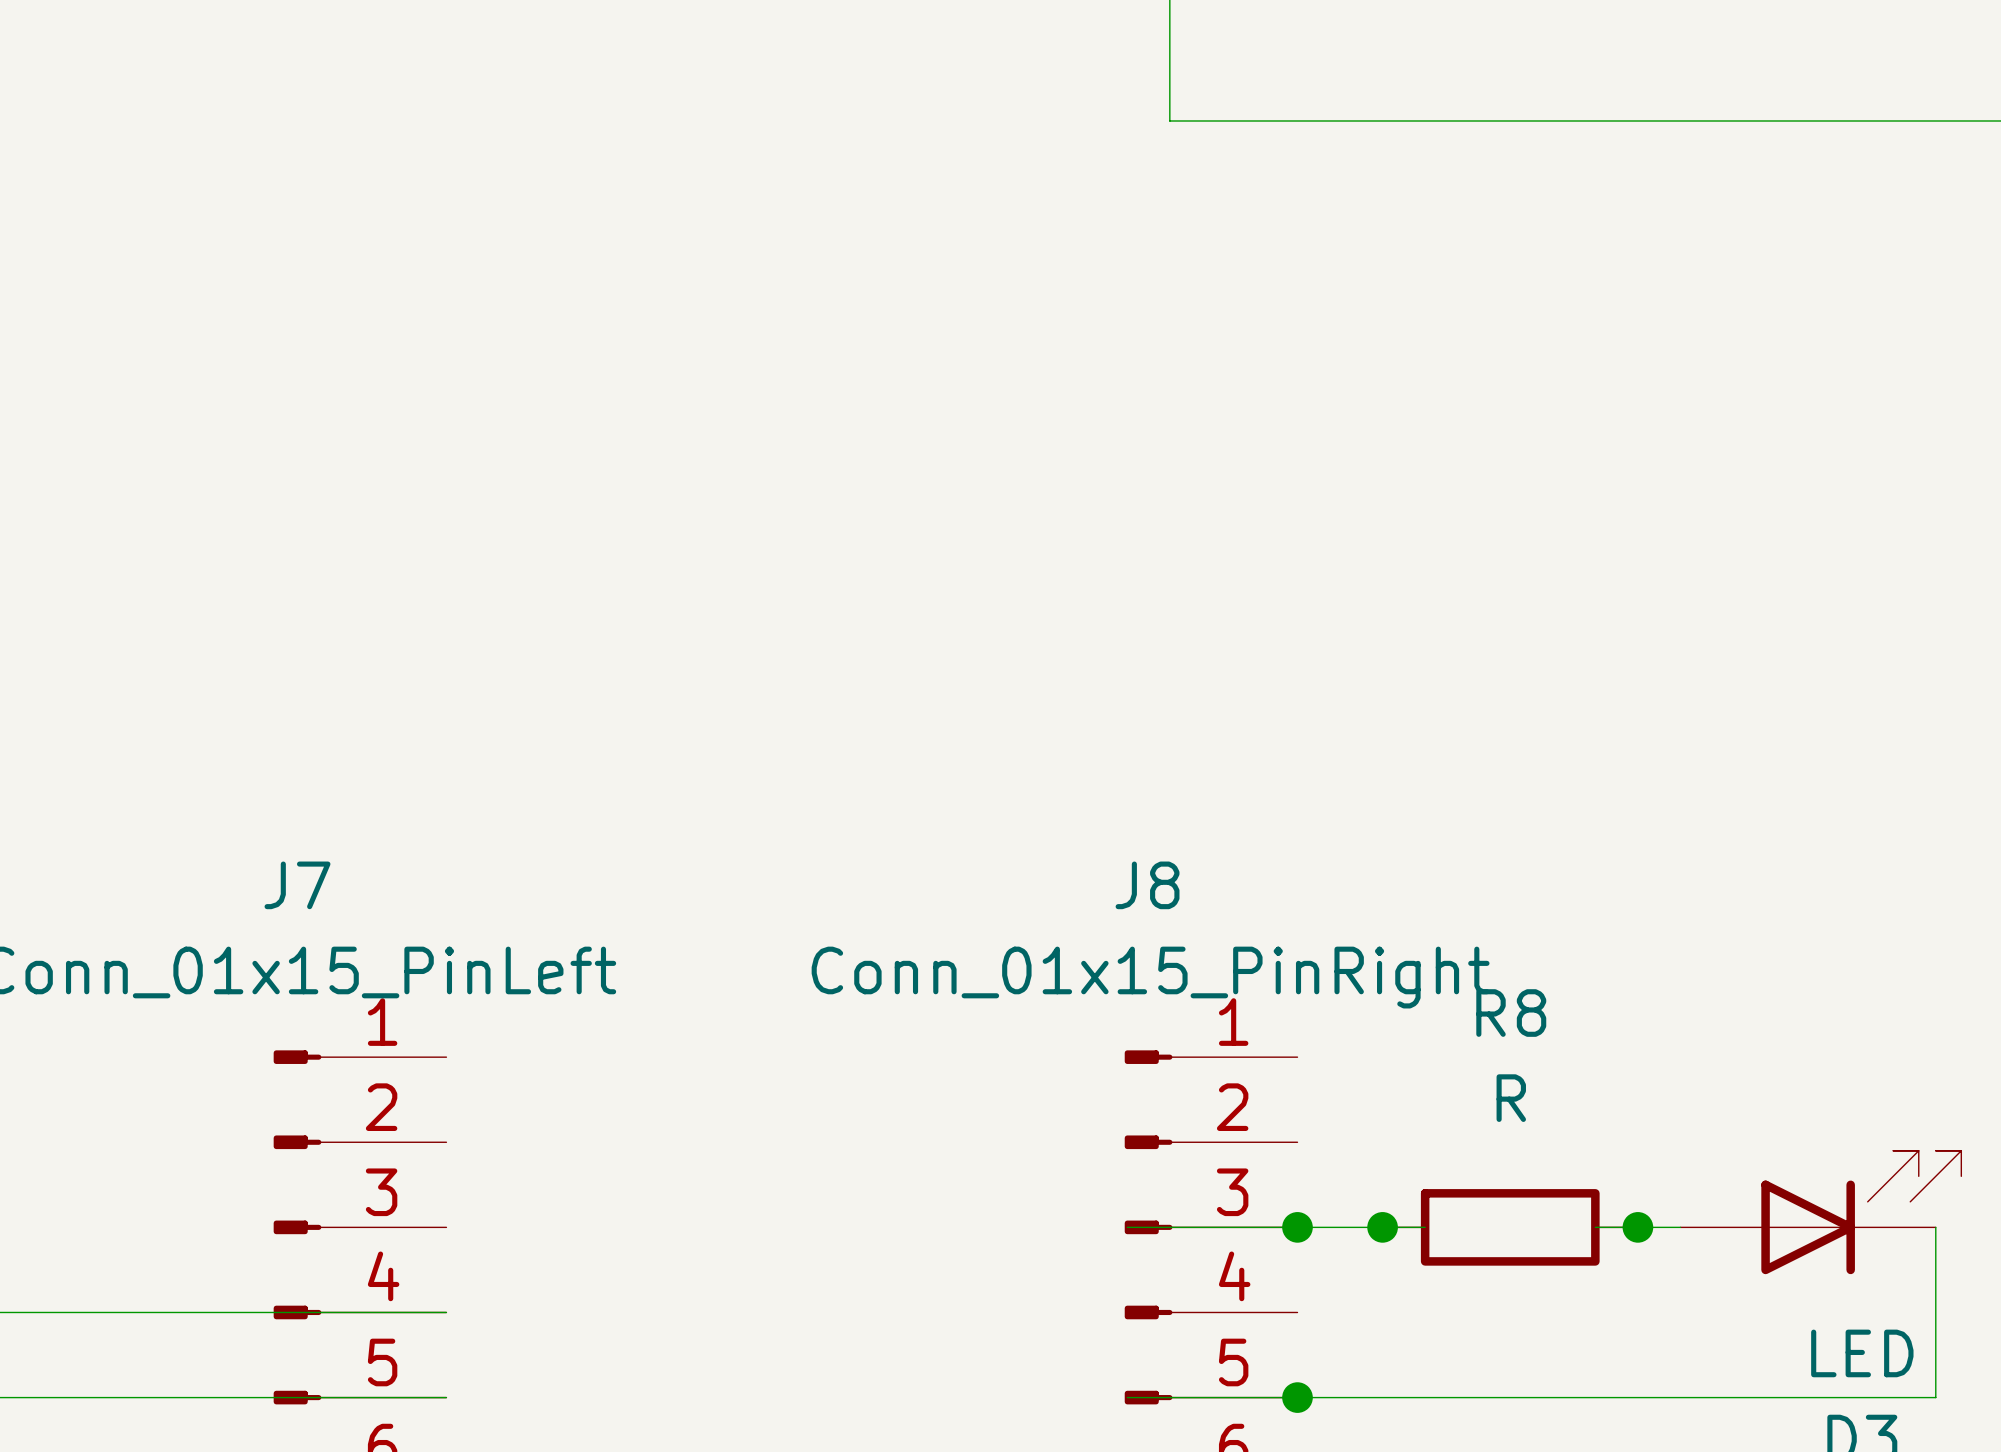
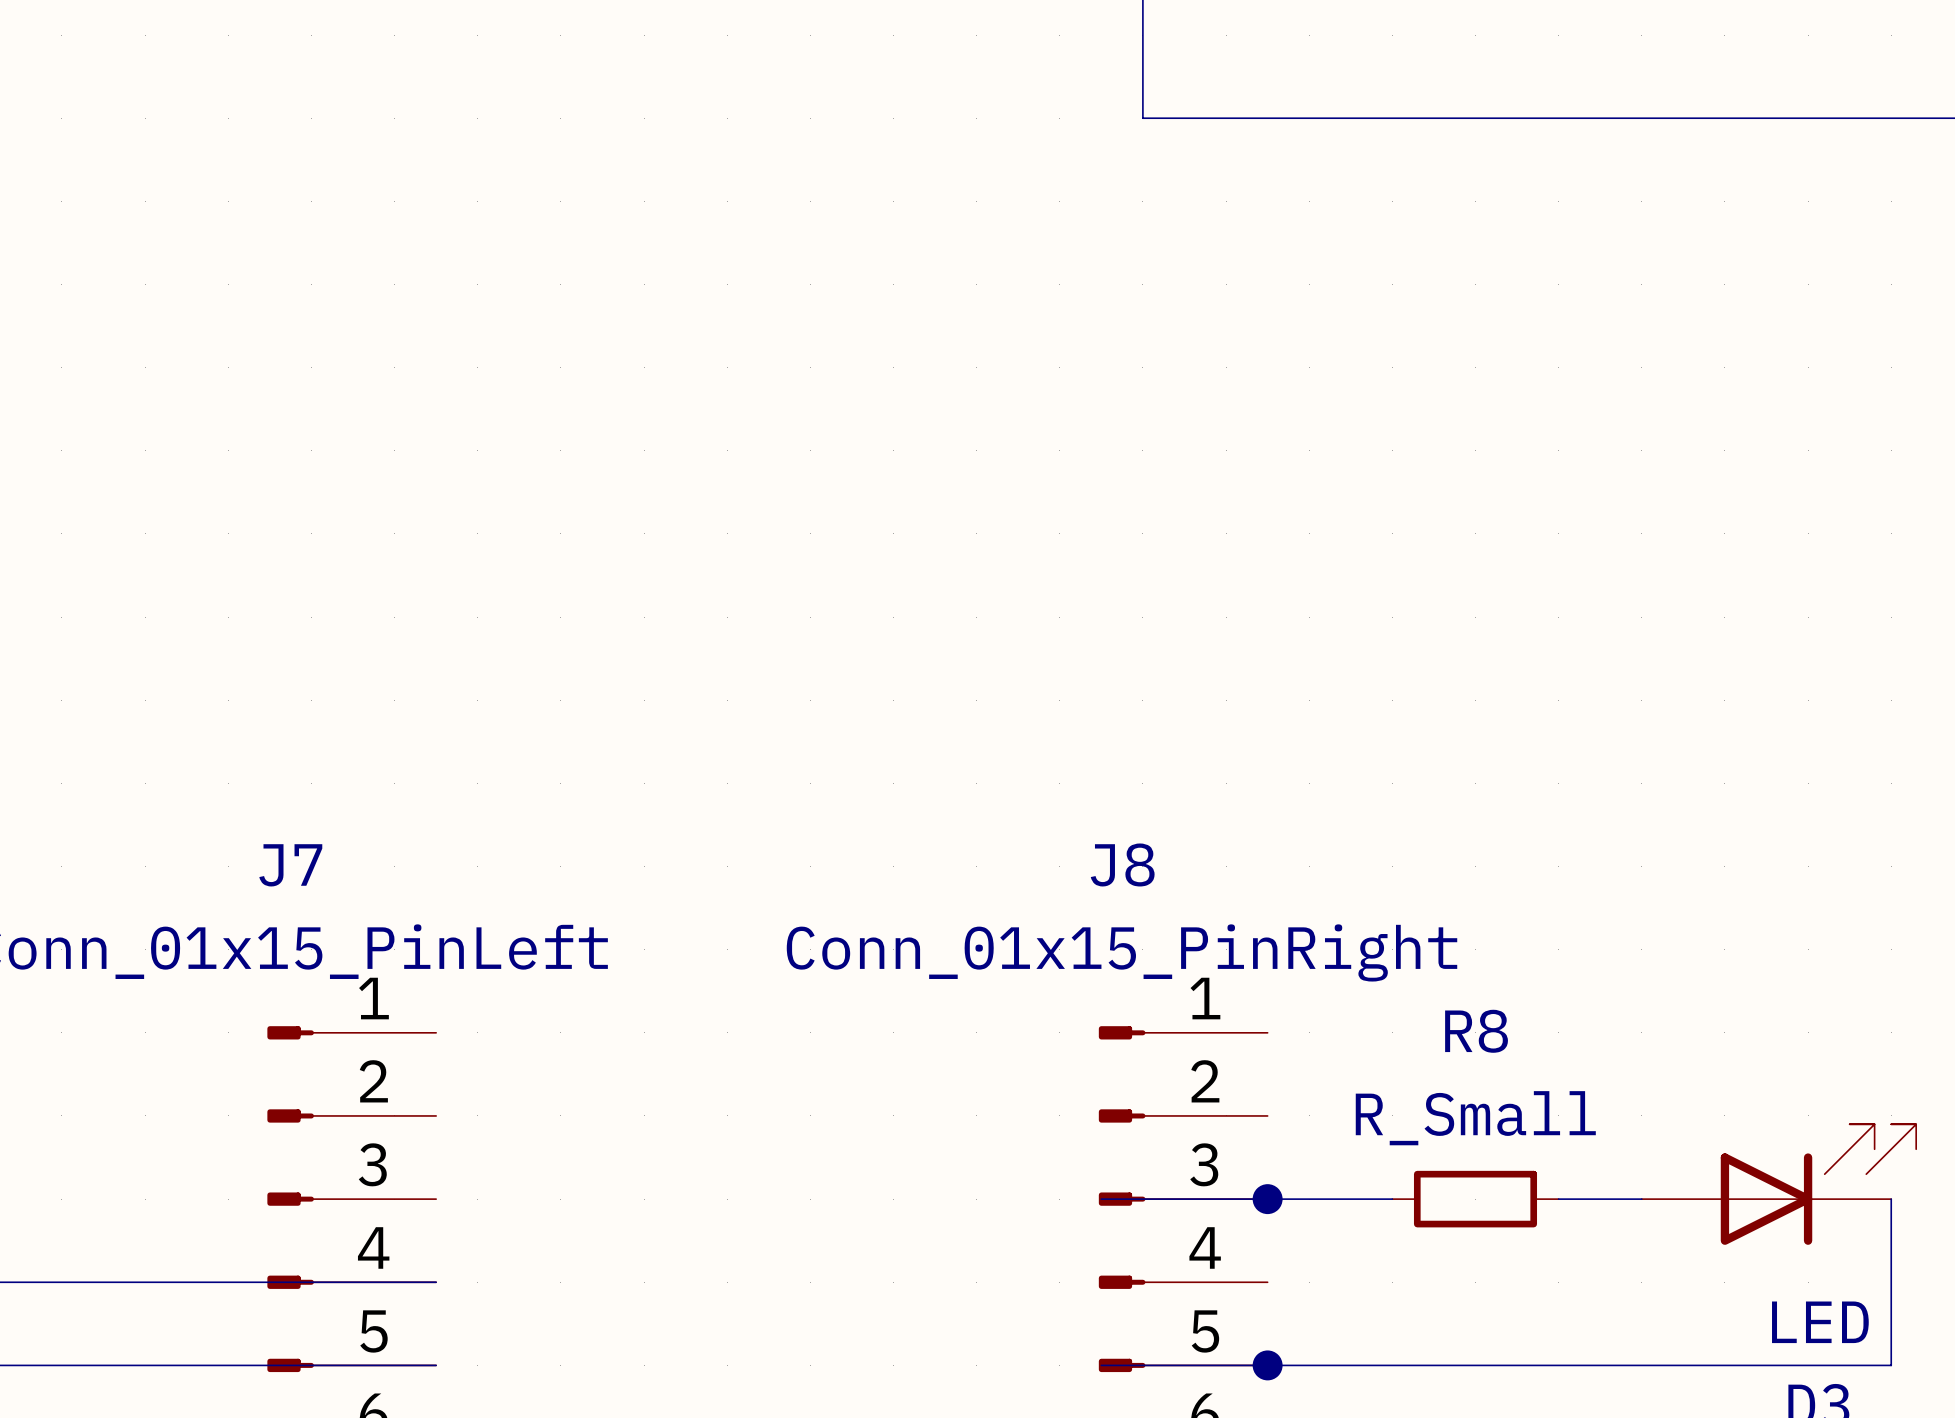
R8 value: R (1511, 1098) -> R_Small (1475, 1118)
R8 symbol: [1382, 1189, 1638, 1266] -> [1392, 1170, 1559, 1228]
junction: (1382, 1227) -> none
junction: (1637, 1227) -> none

